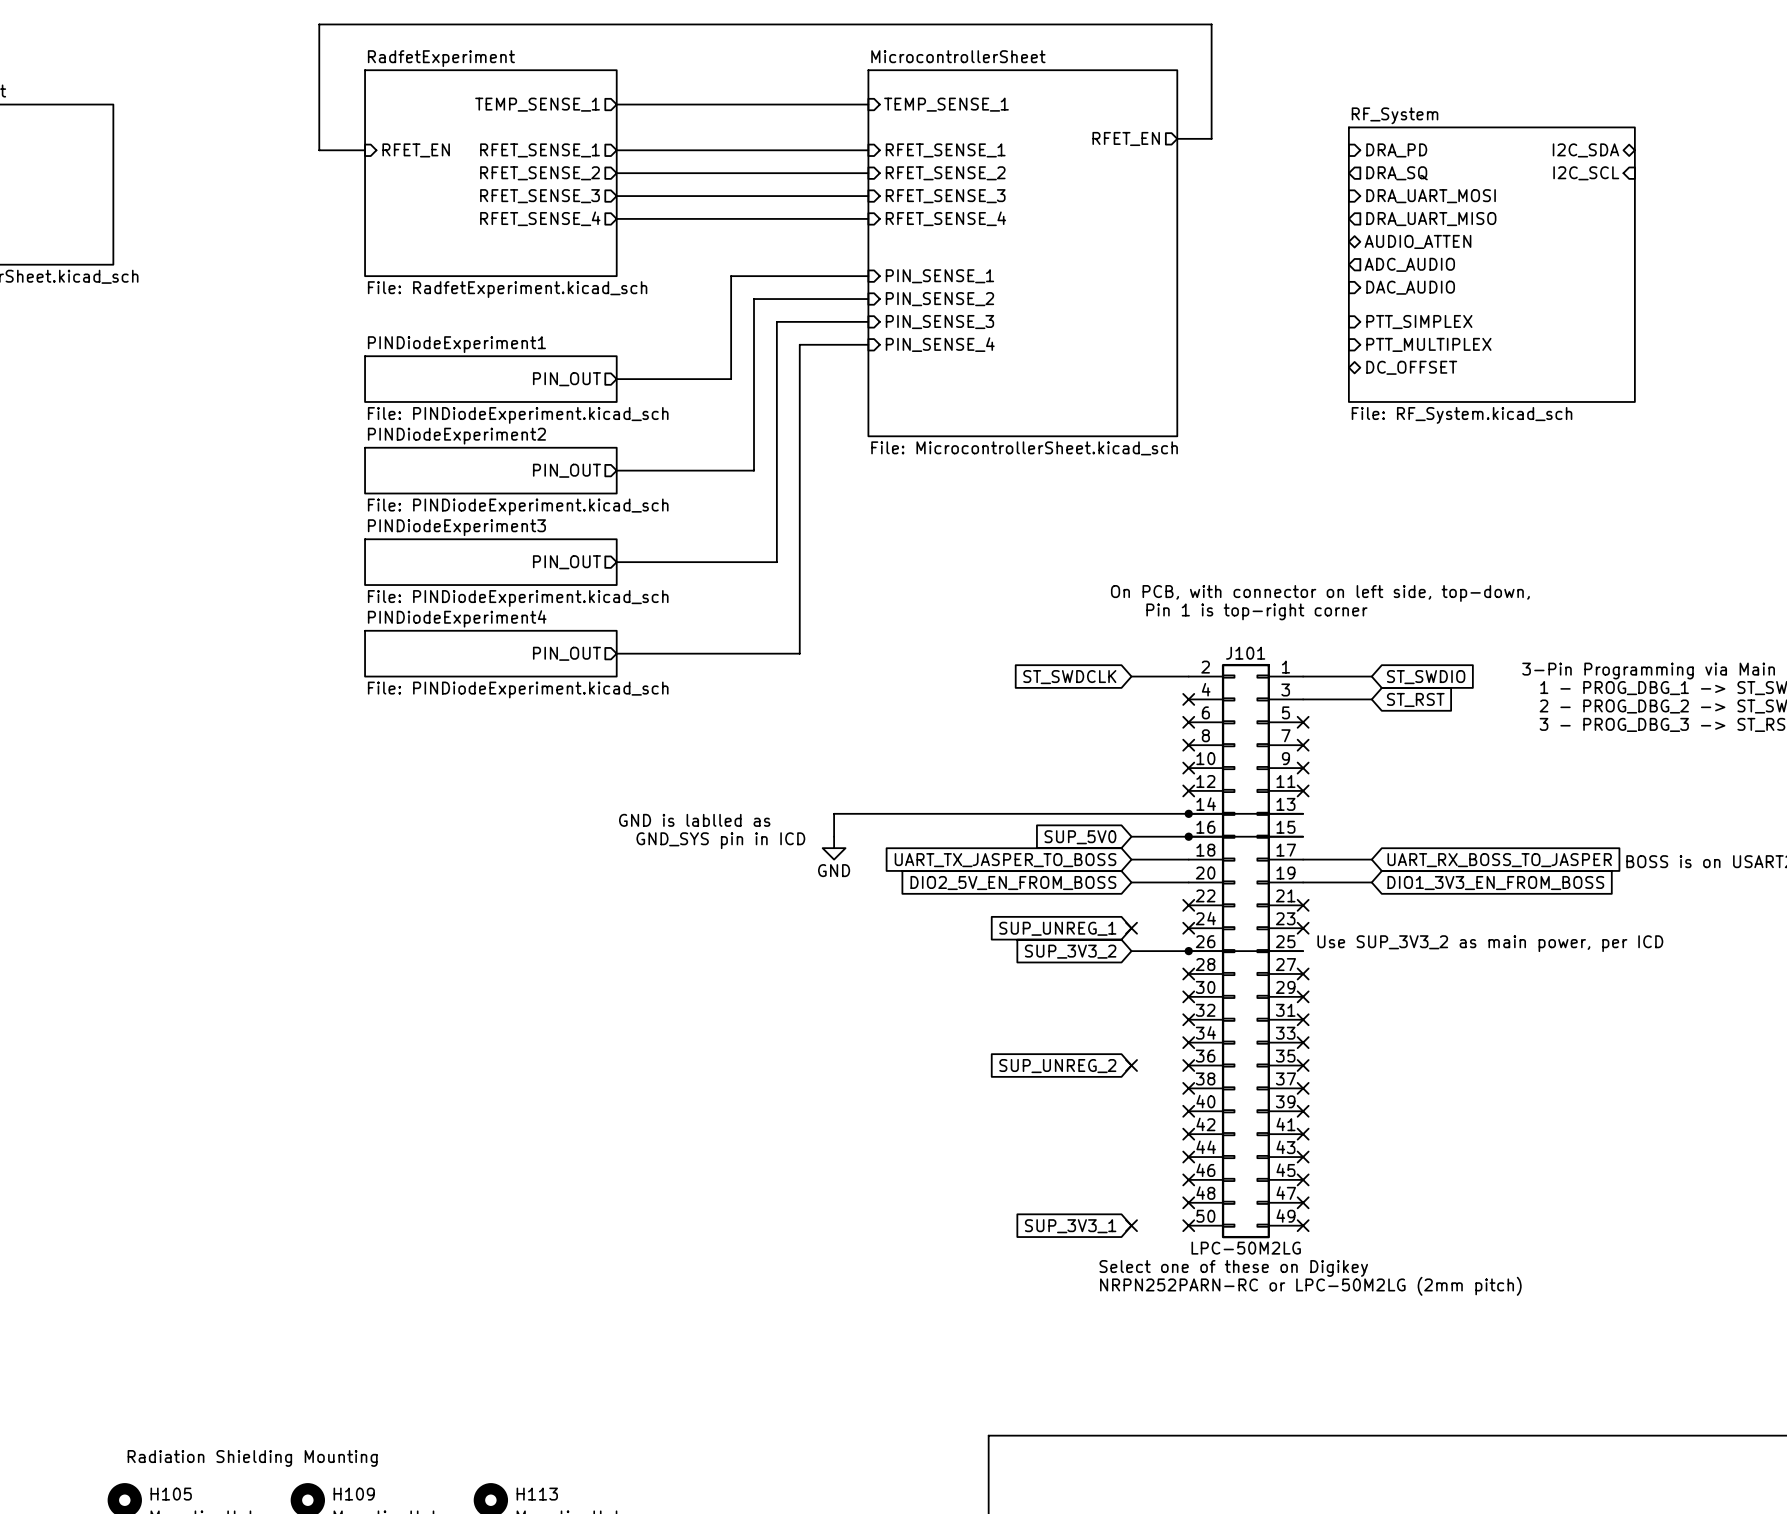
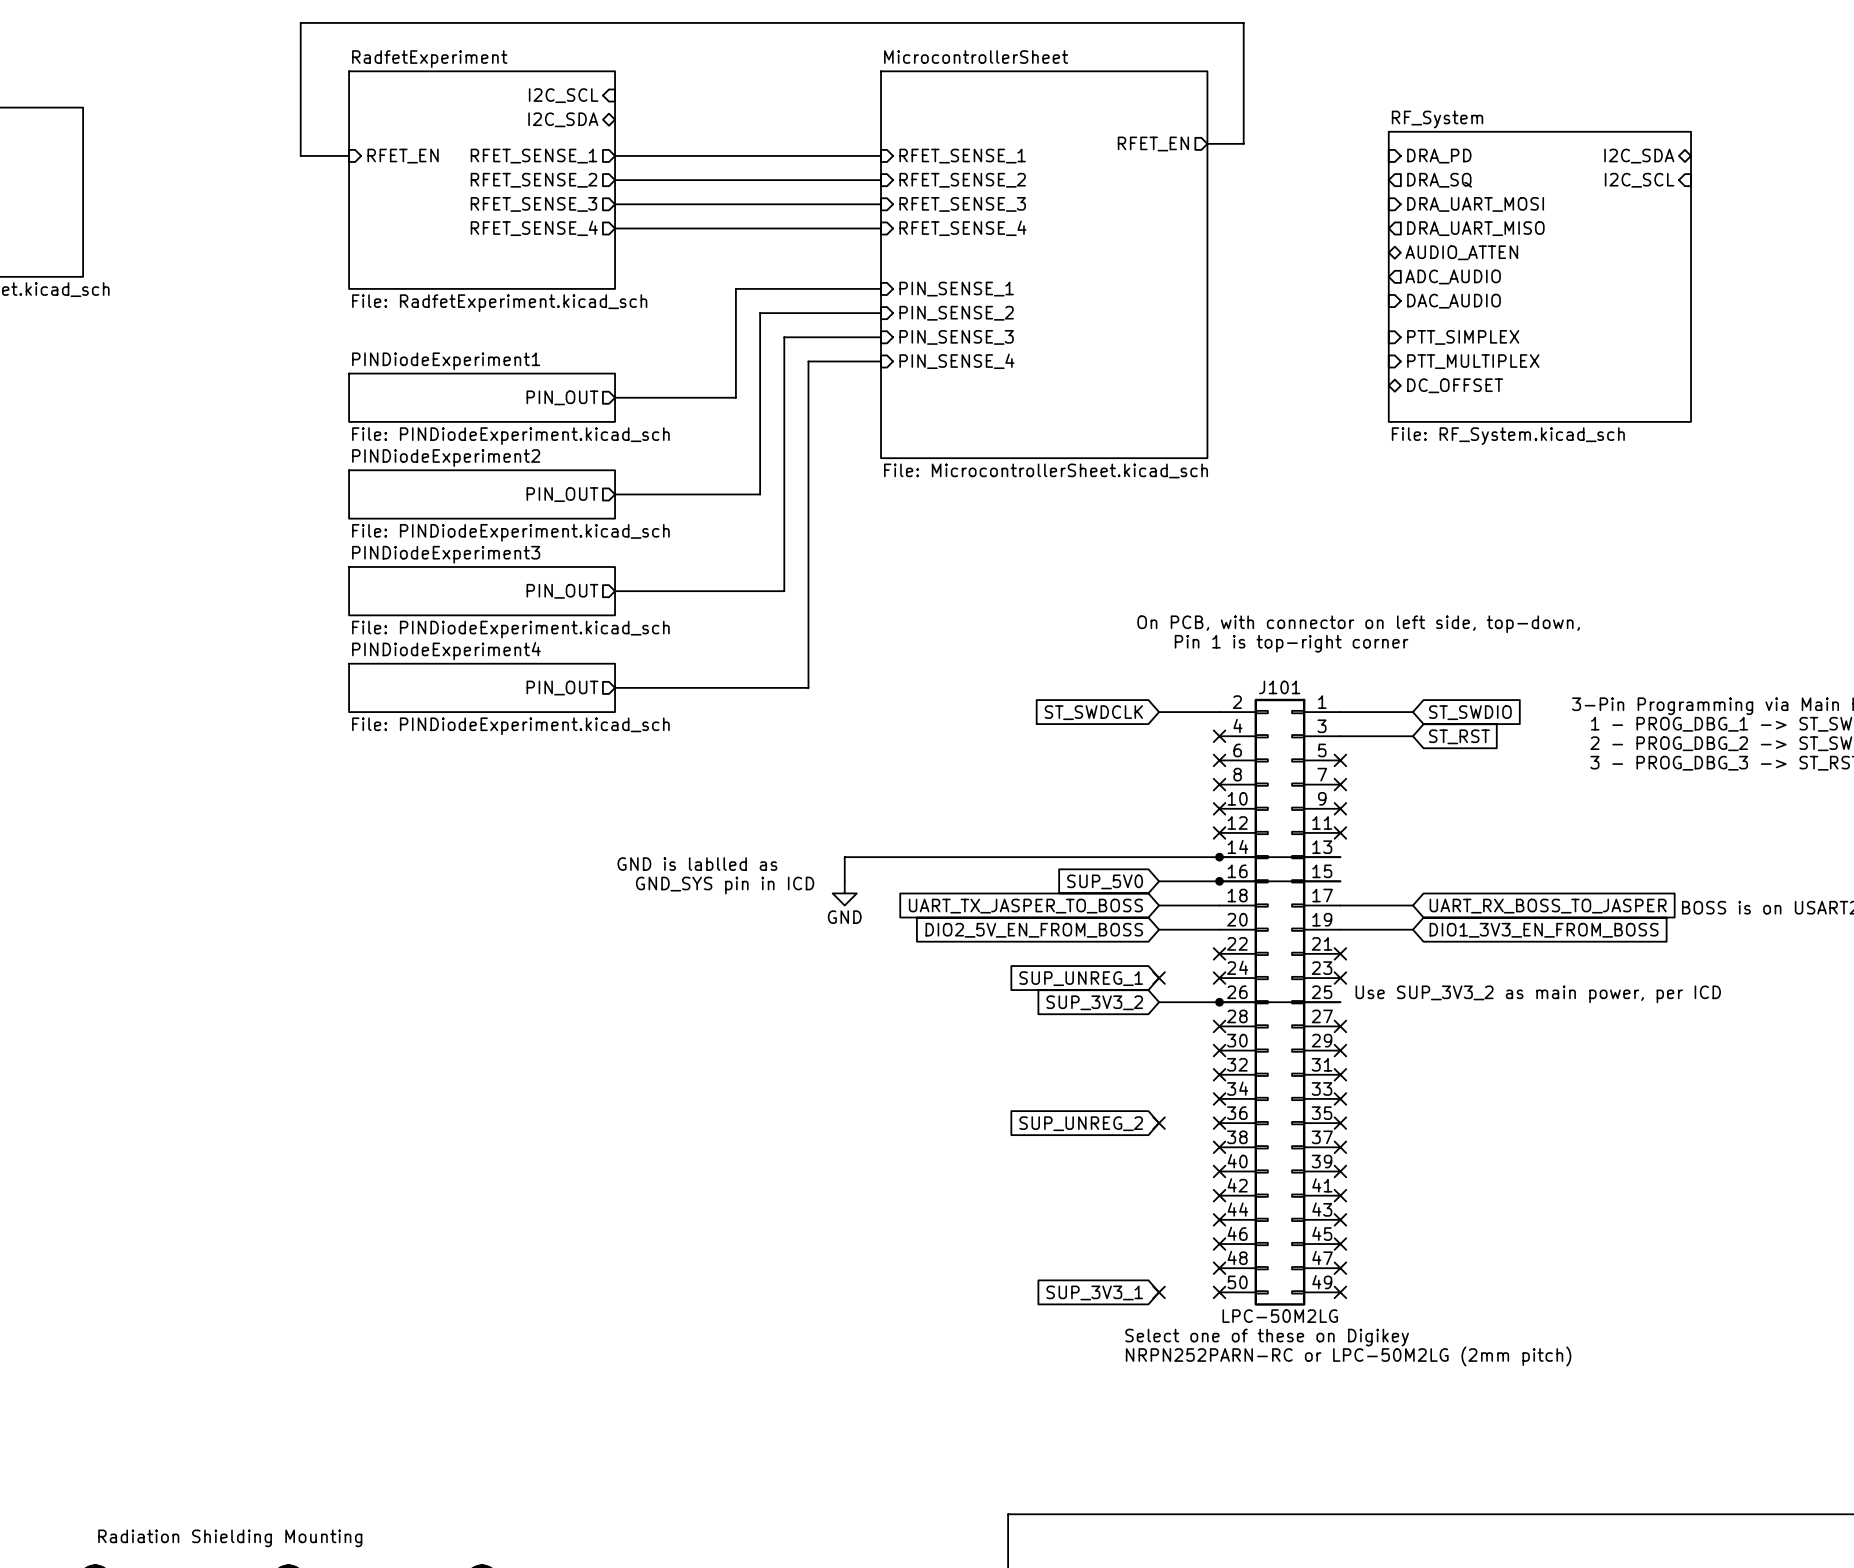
sheet pin: none -> I2C_SCL (563, 95)
sheet pin: TEMP_SENSE_1 (537, 104) -> none
wire: (616, 104) (868, 104) -> none
sheet pin: TEMP_SENSE_1 (946, 104) -> none
sheet pin: none -> I2C_SDA (563, 119)

